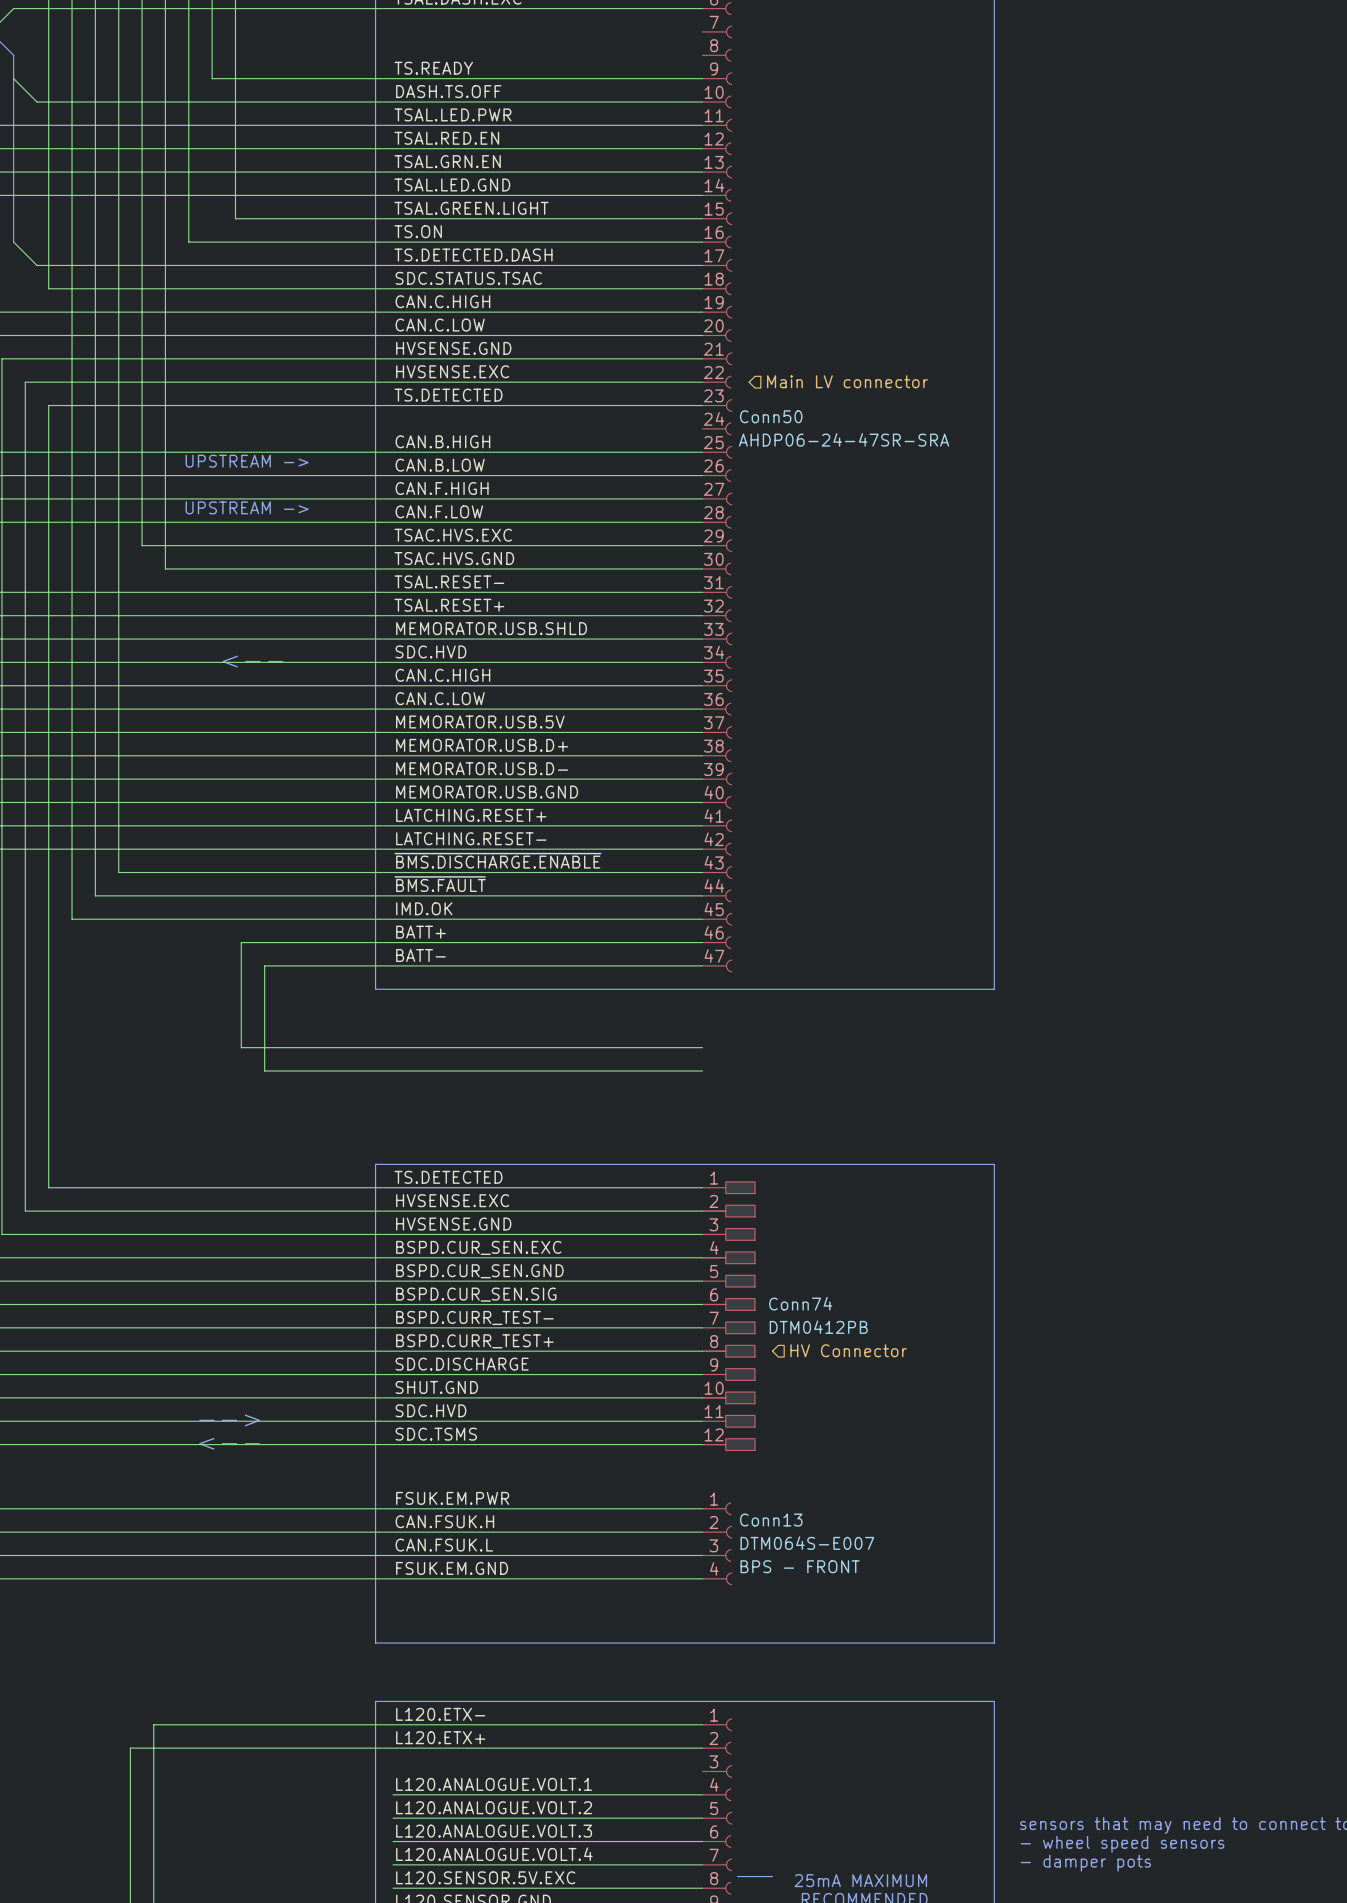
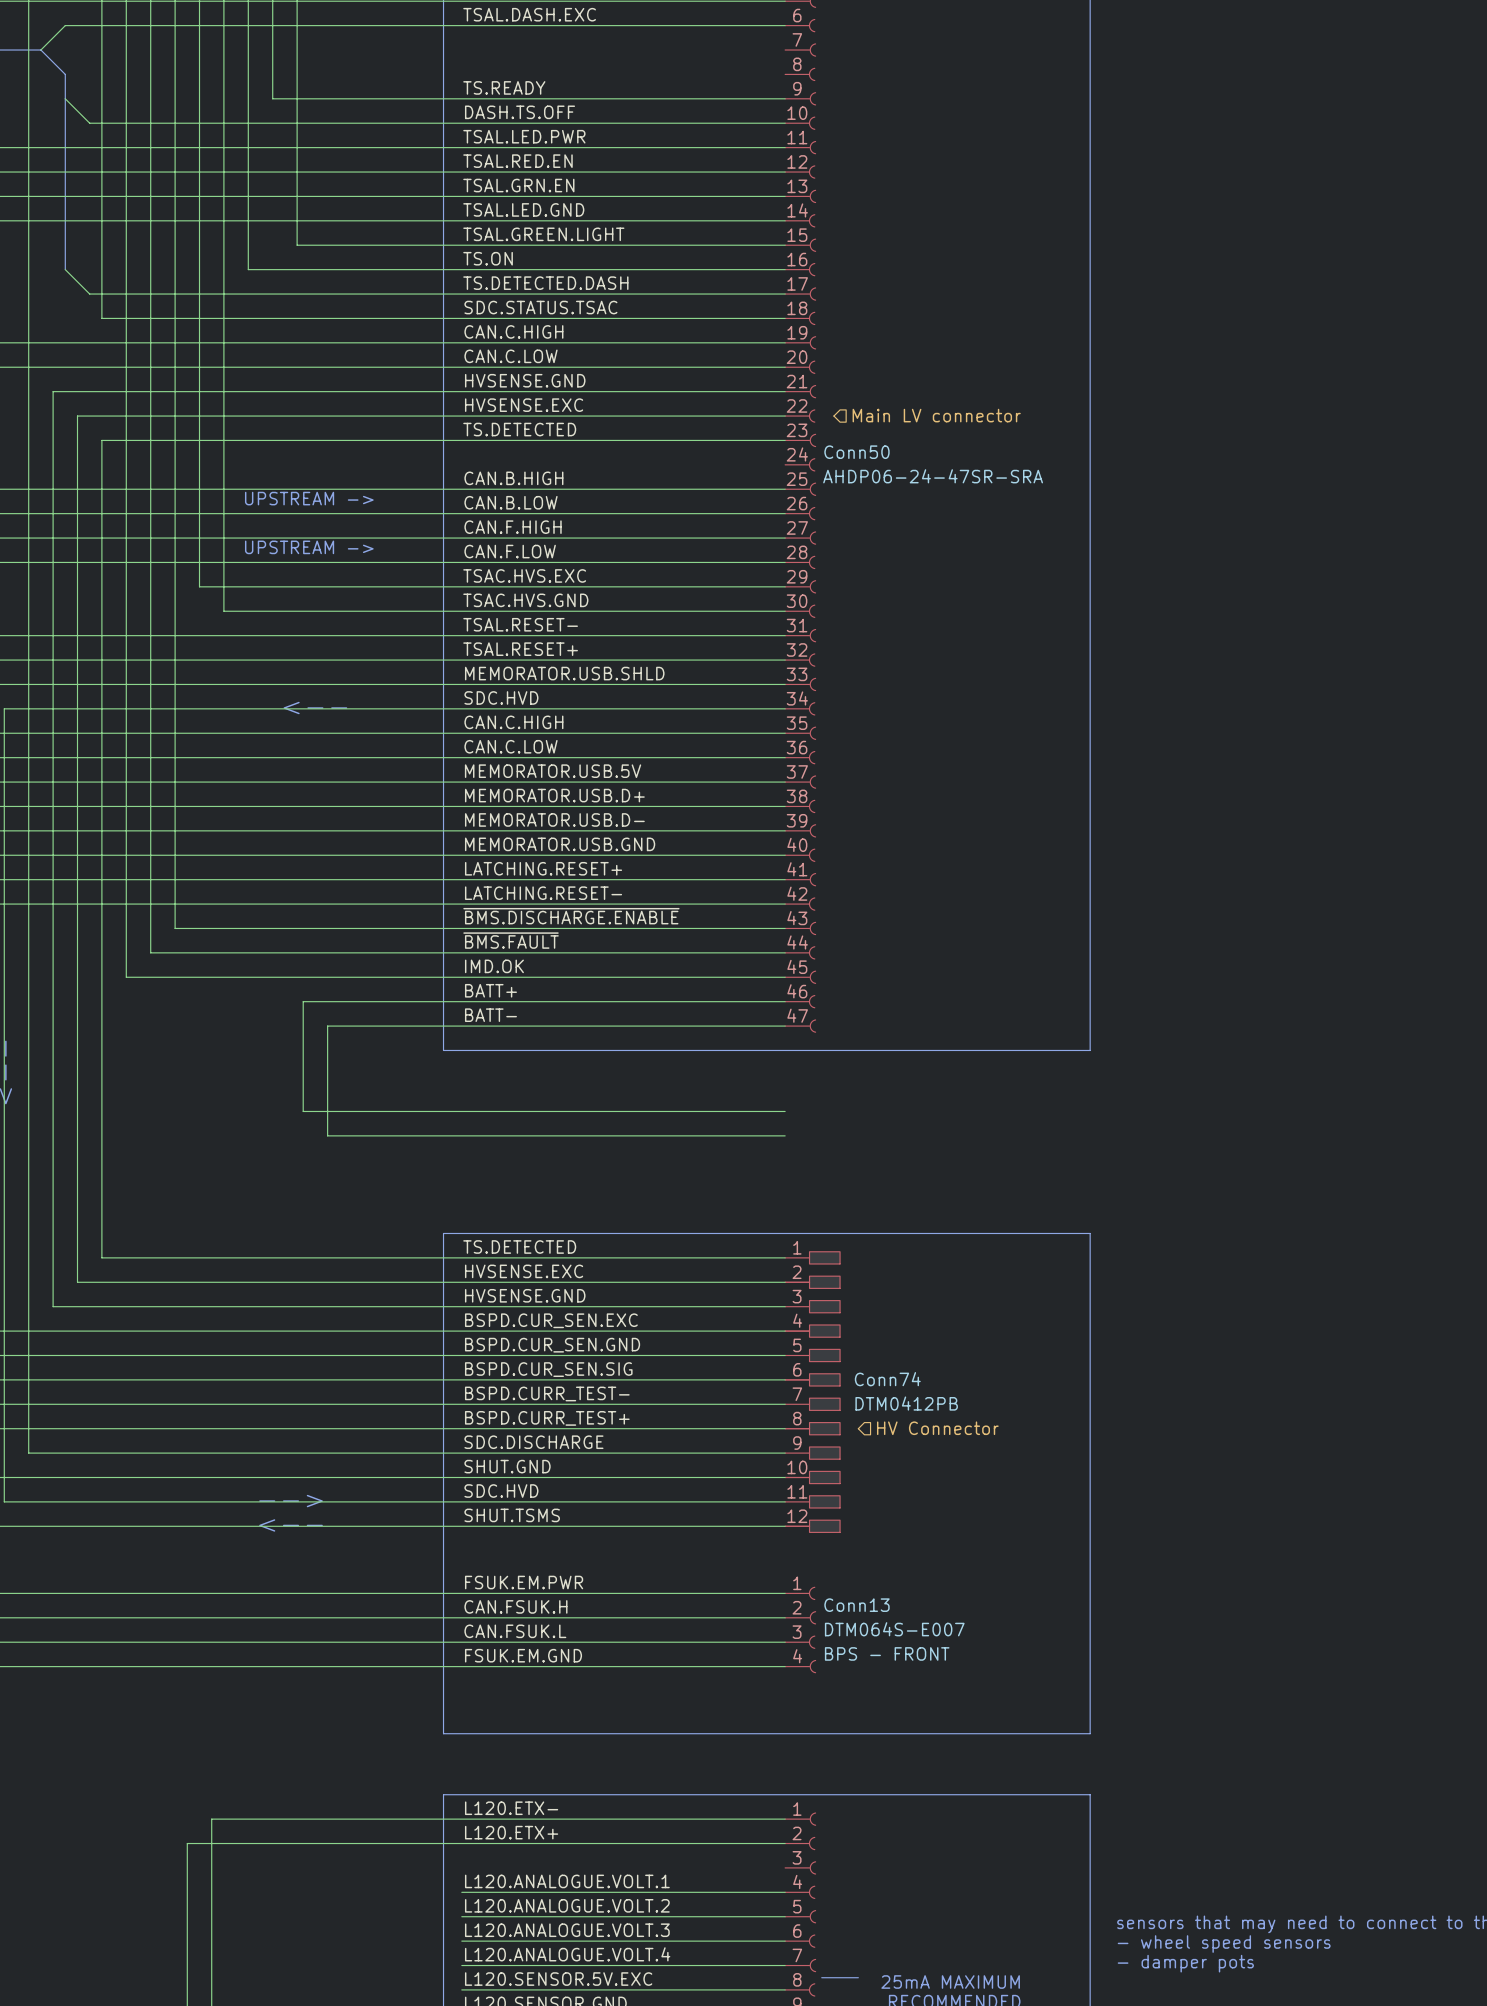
label: SDC.TSMS (436, 1434) -> SHUT.TSMS (512, 1515)

